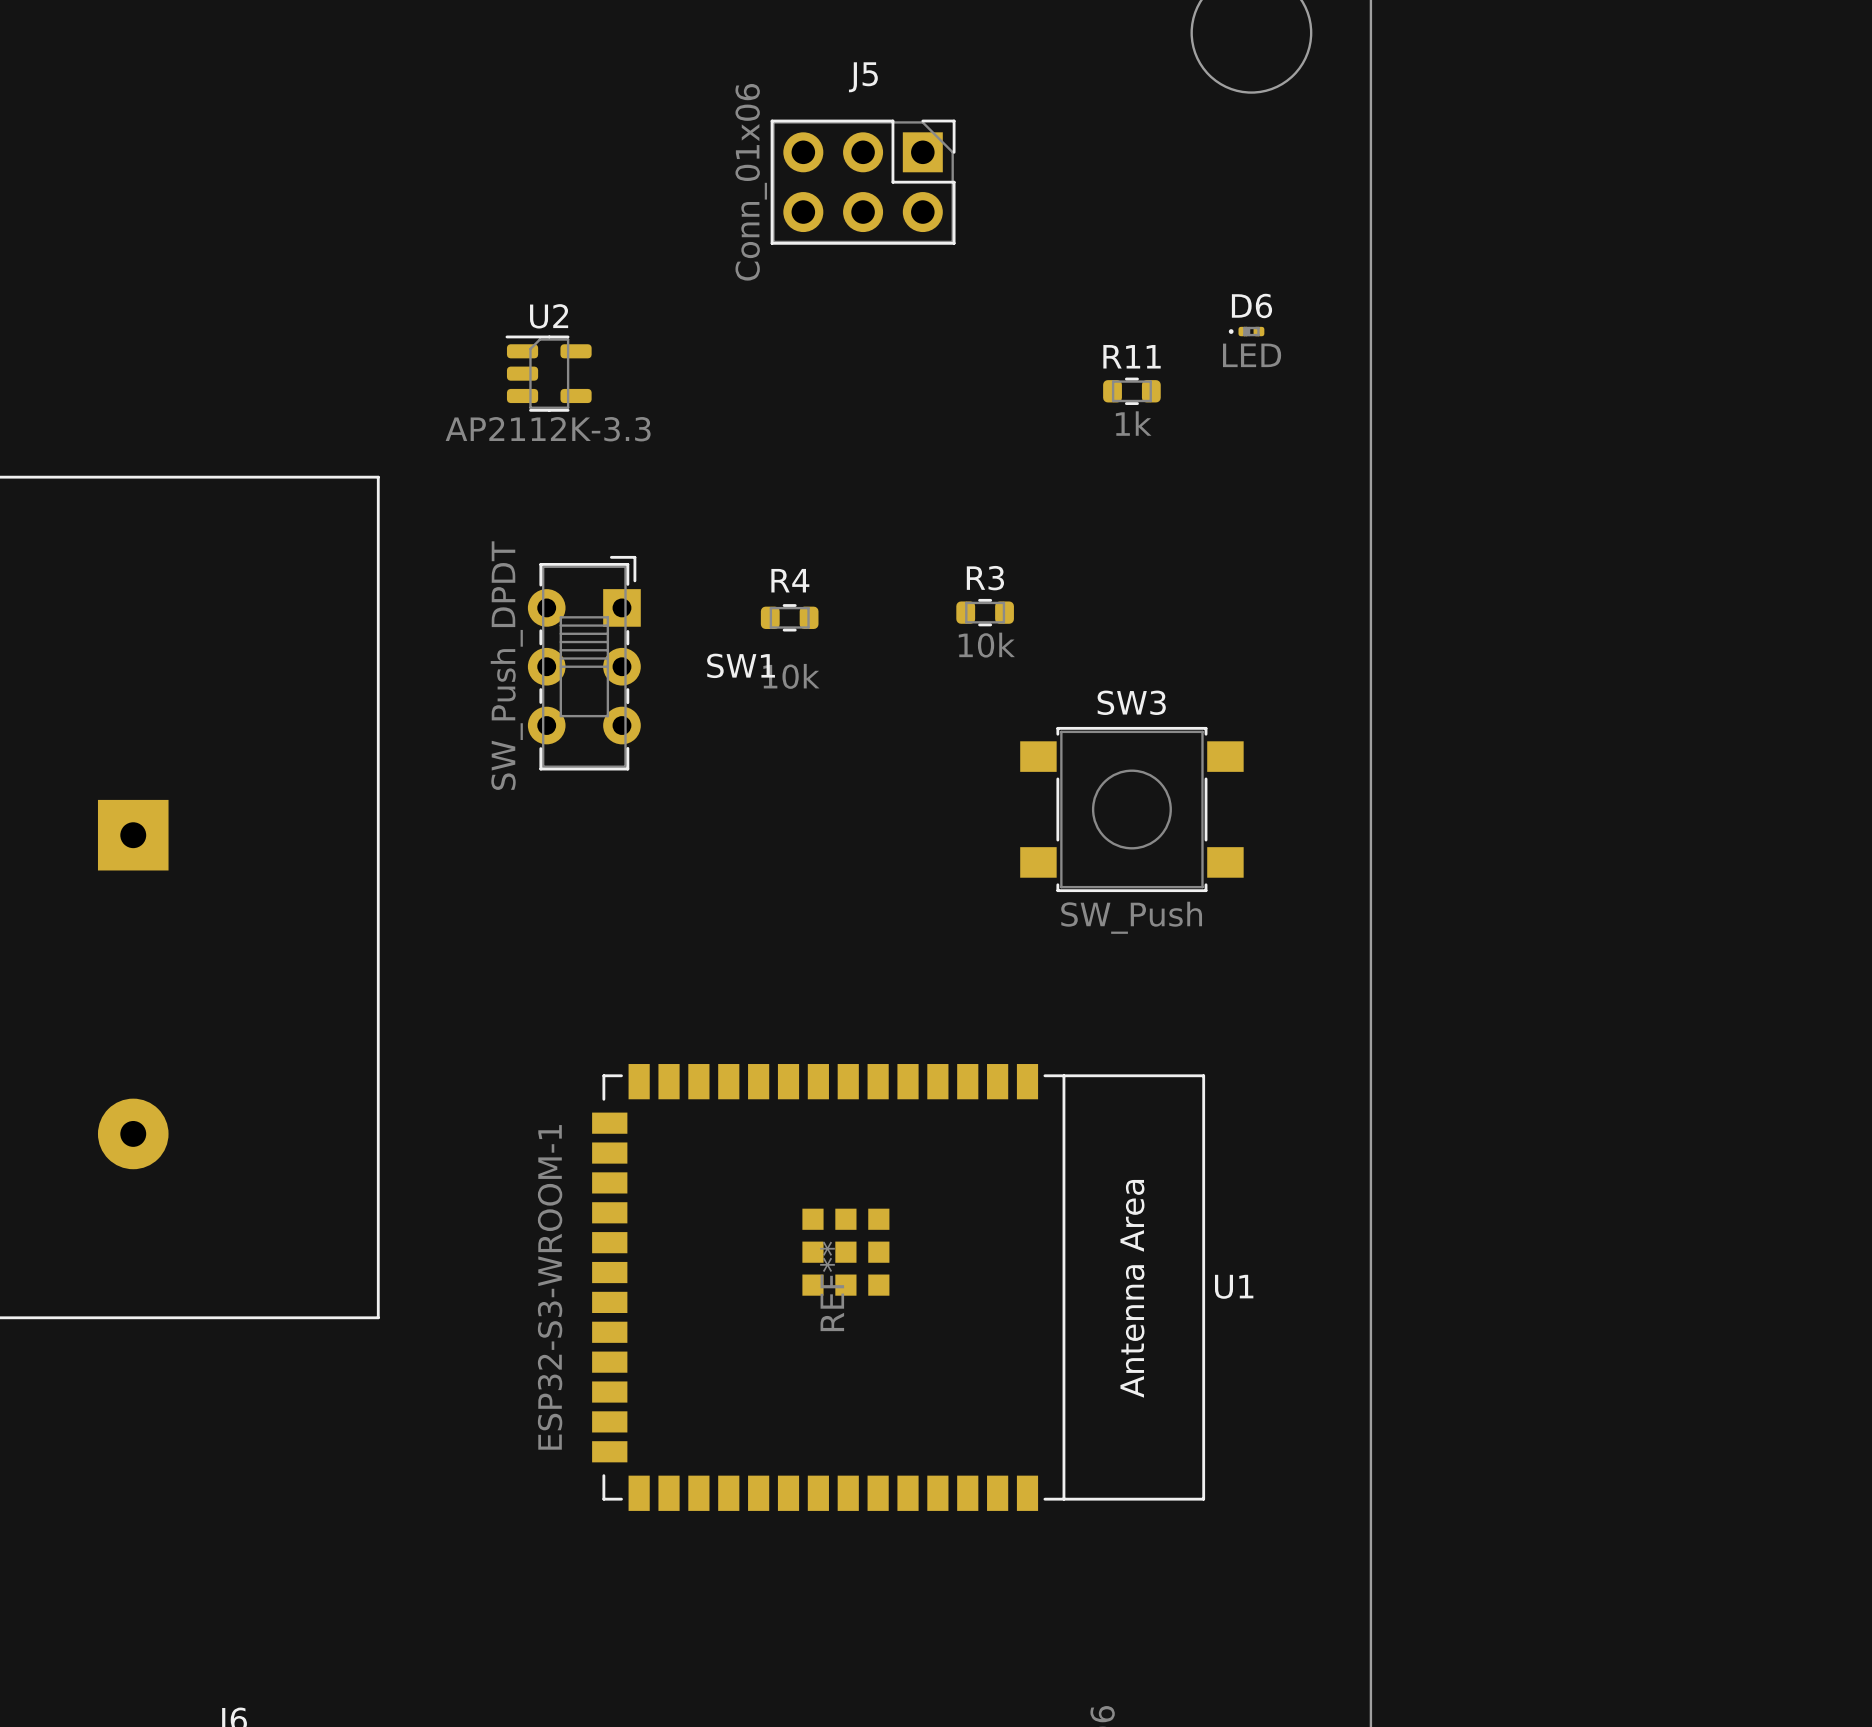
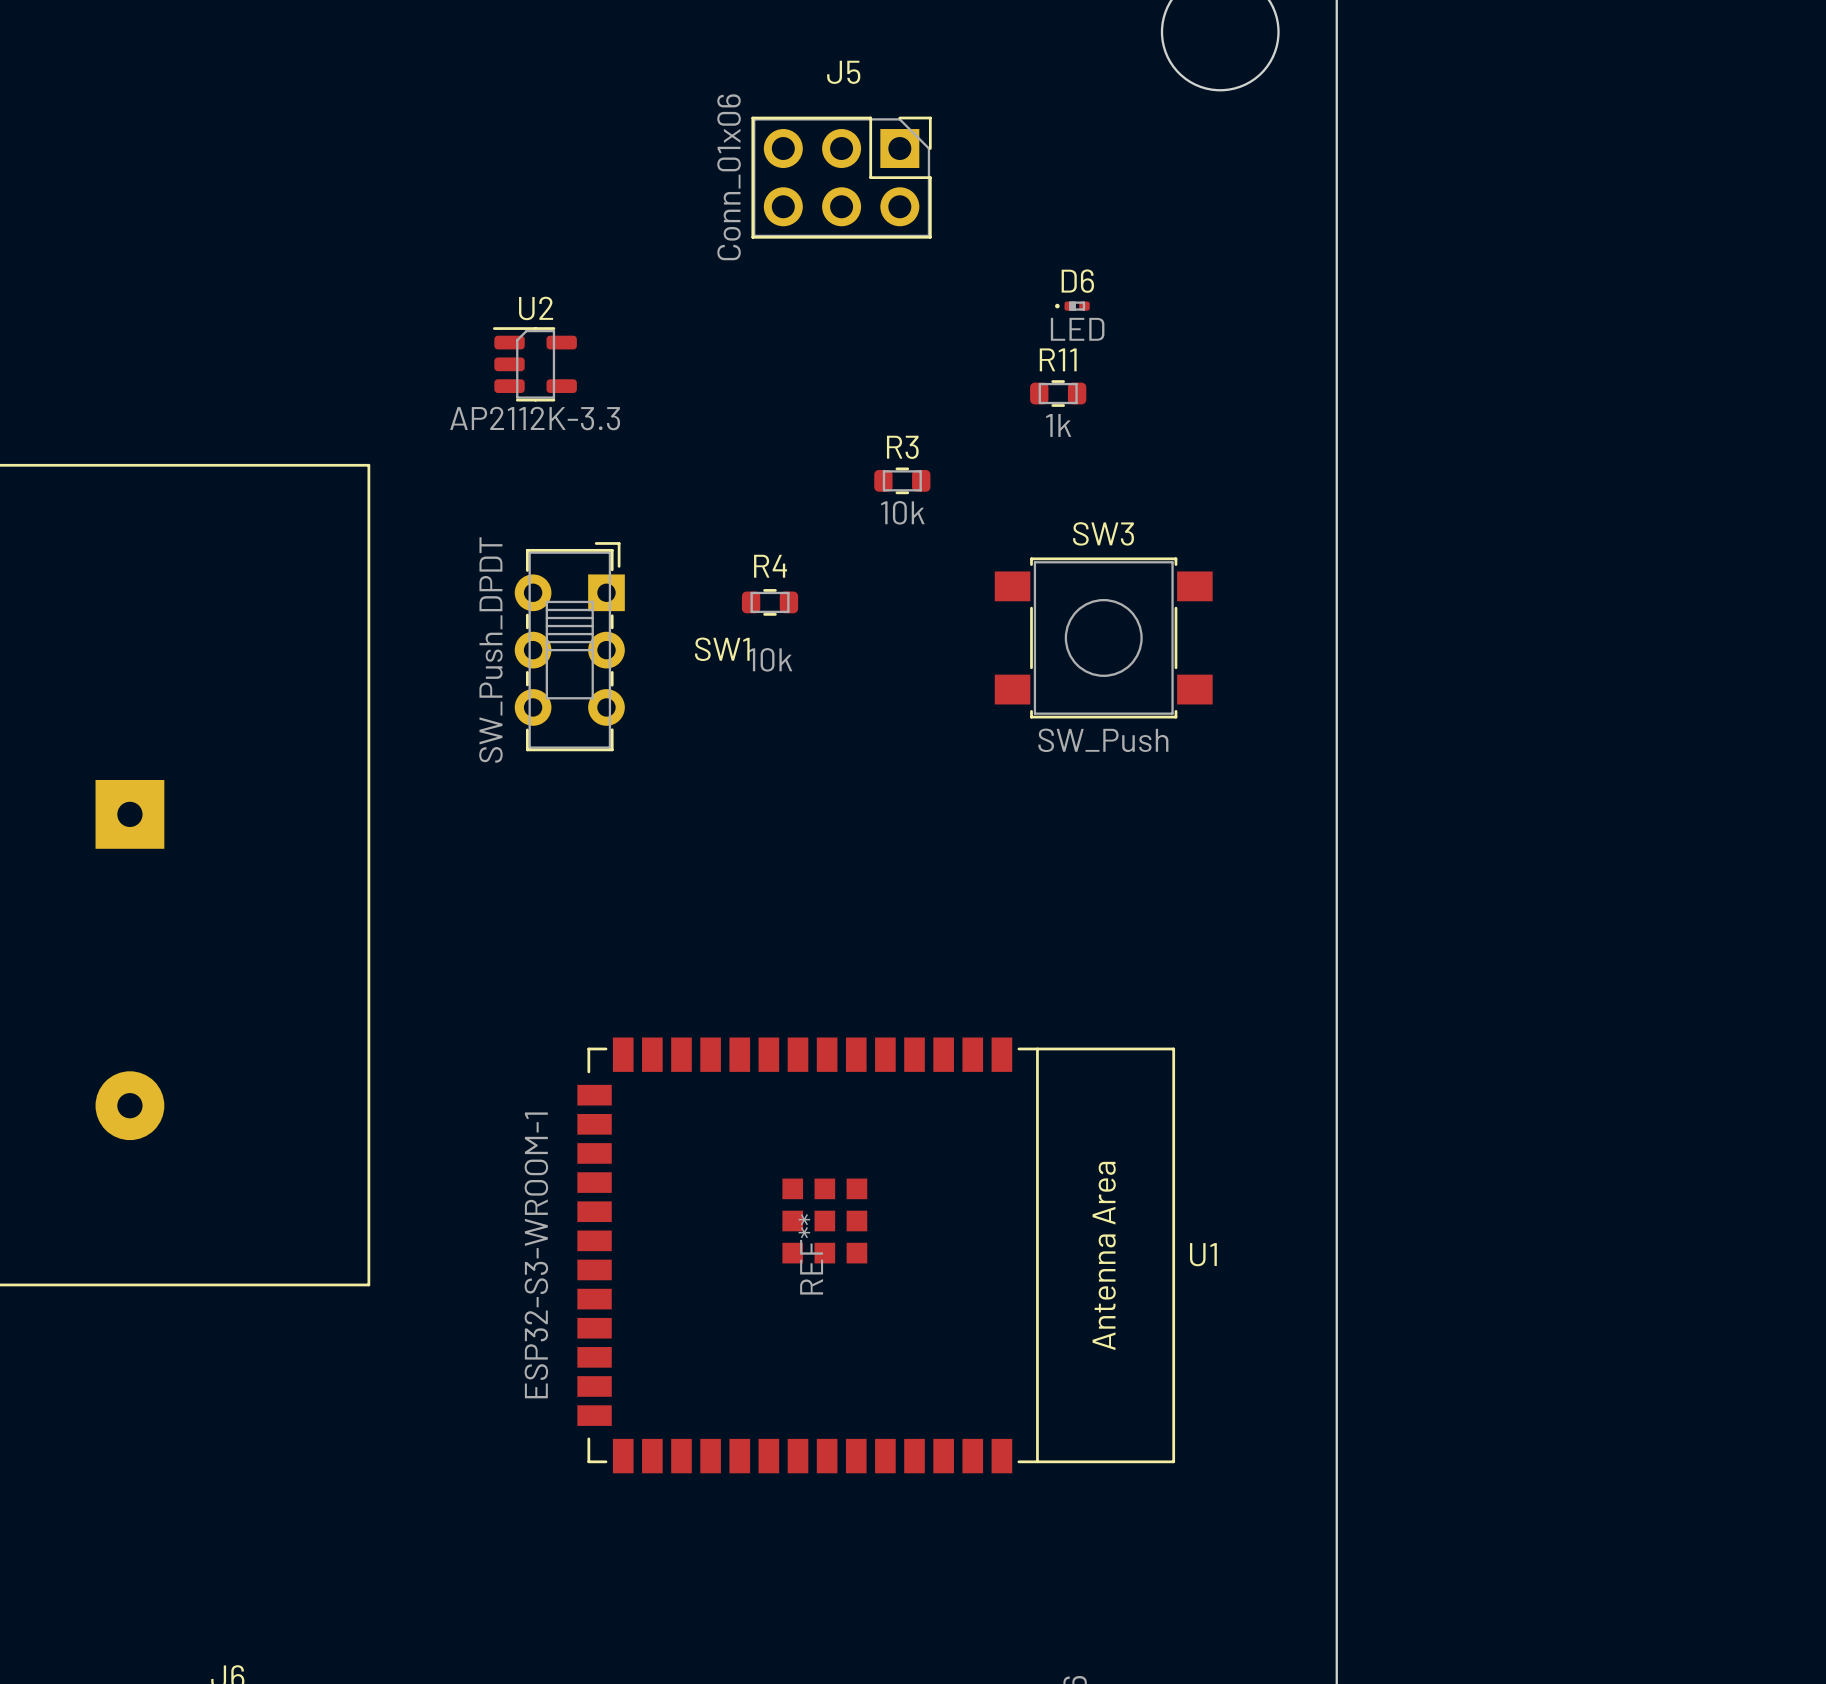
D6 position: (1246, 331) -> (1072, 306)
R11 position: (1131, 391) -> (1058, 393)
R3 position: (985, 612) -> (902, 480)
SW3 position: (1131, 809) -> (1103, 637)

